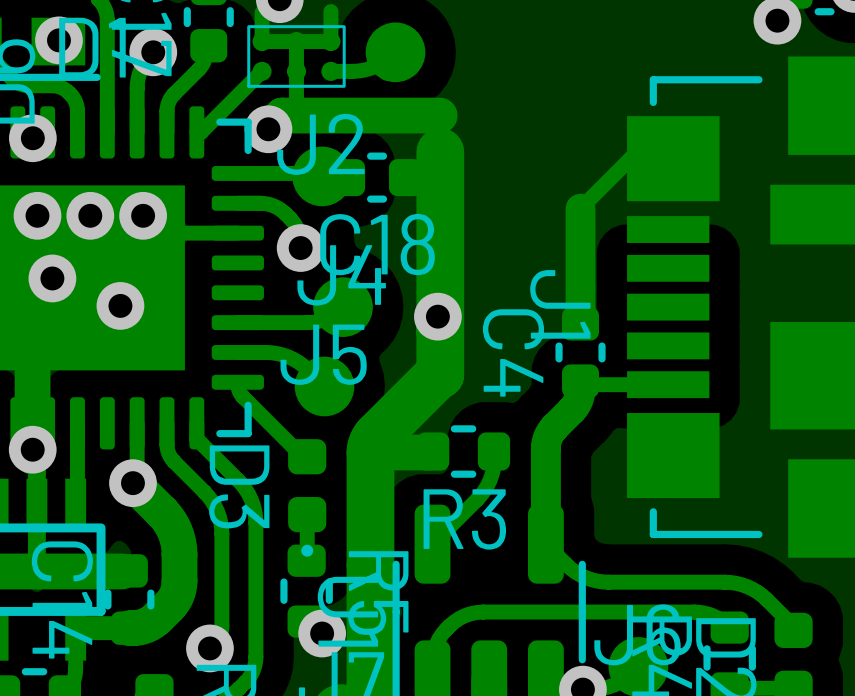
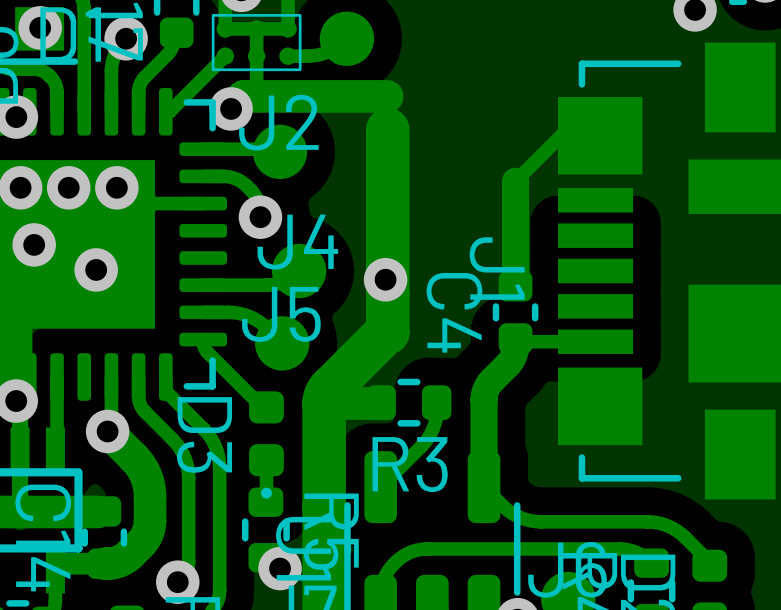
C18: (377, 177) -> none

